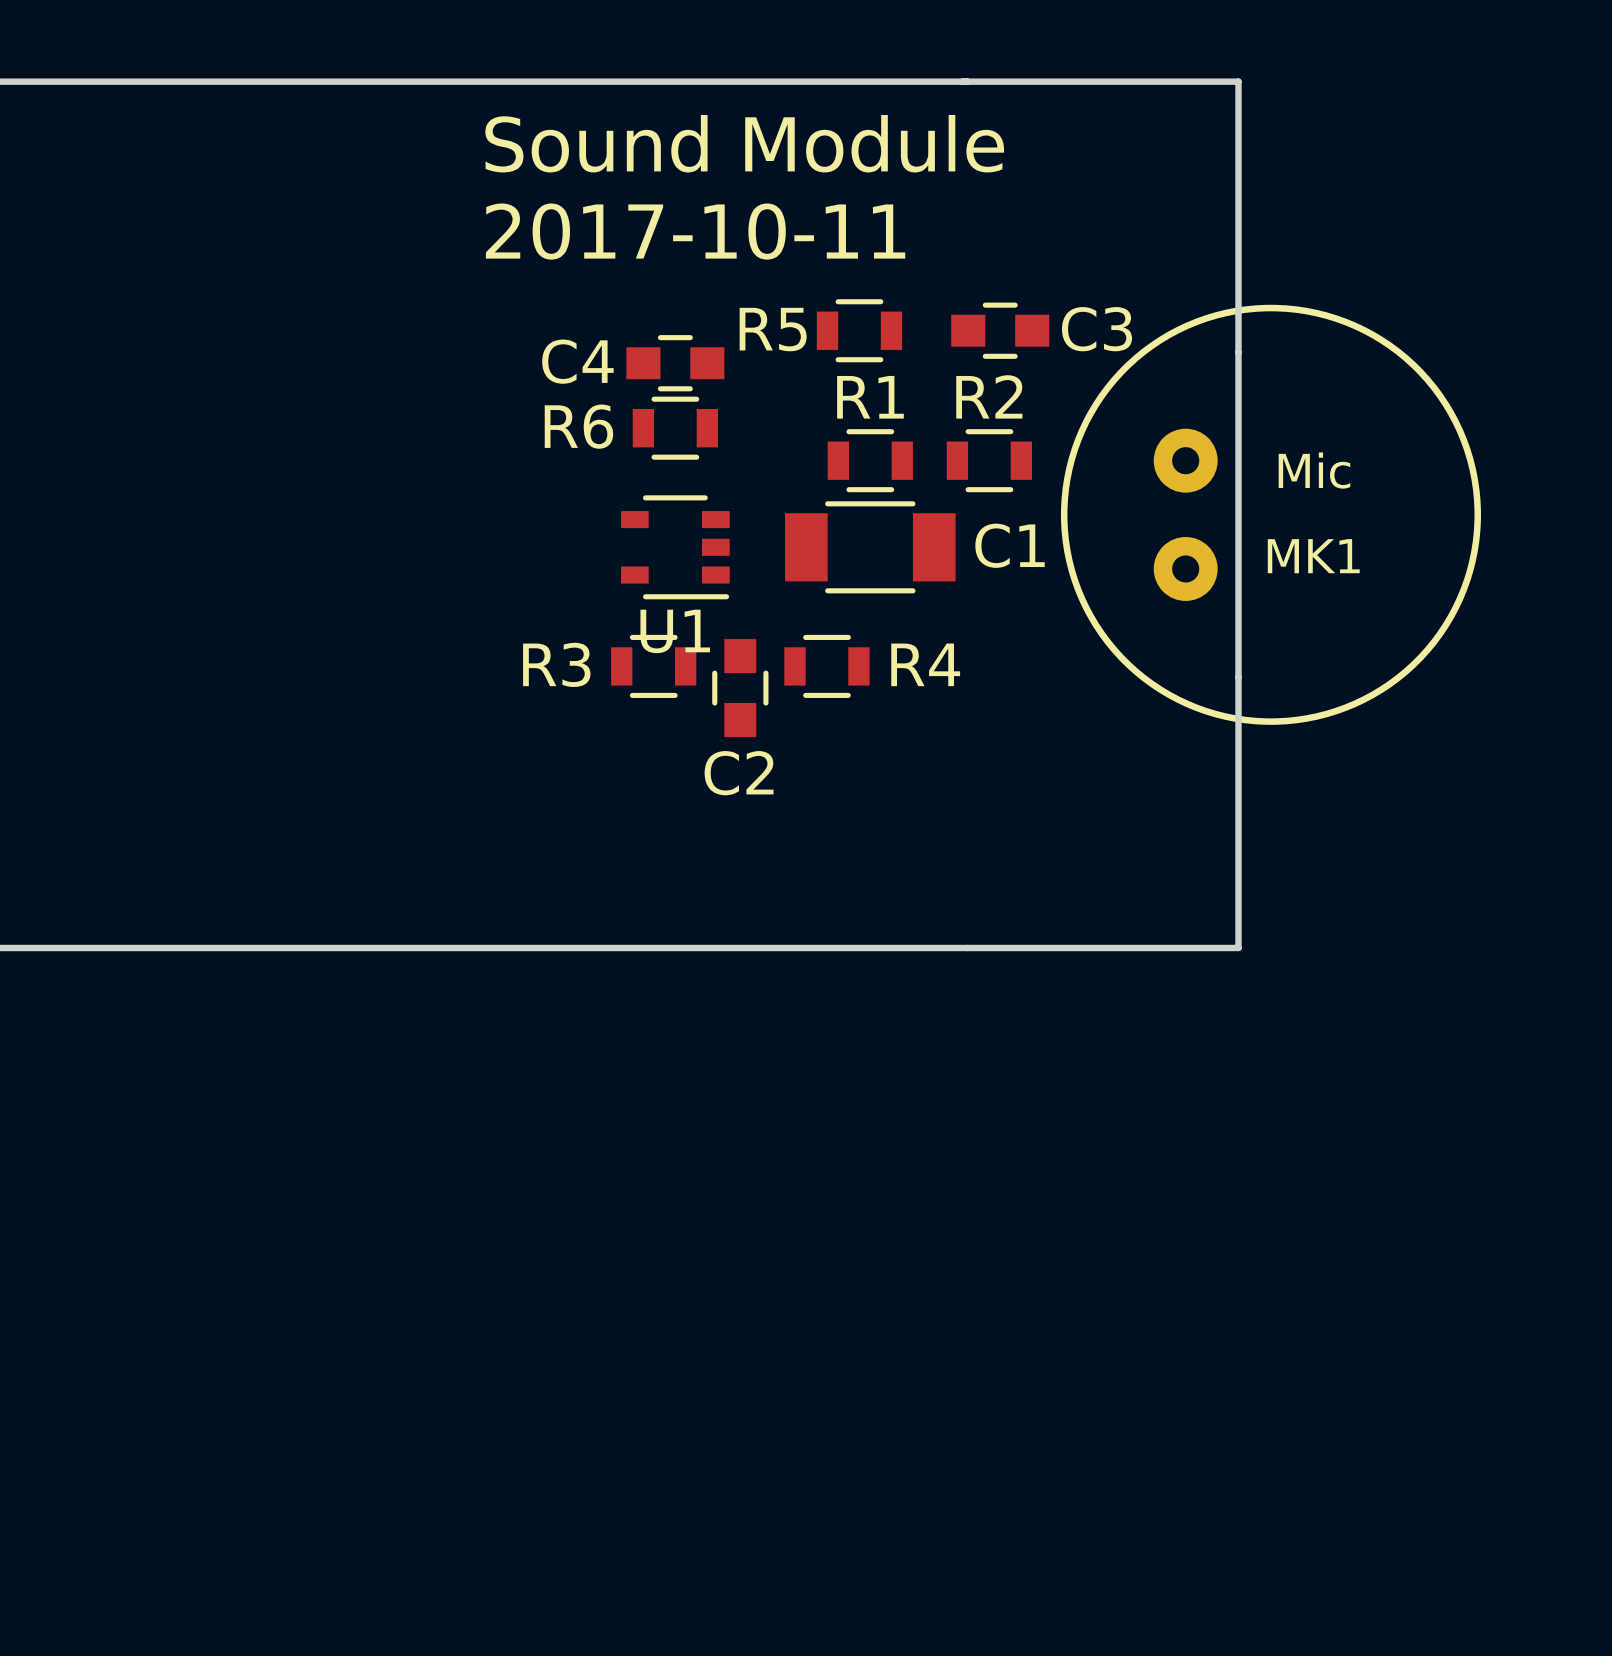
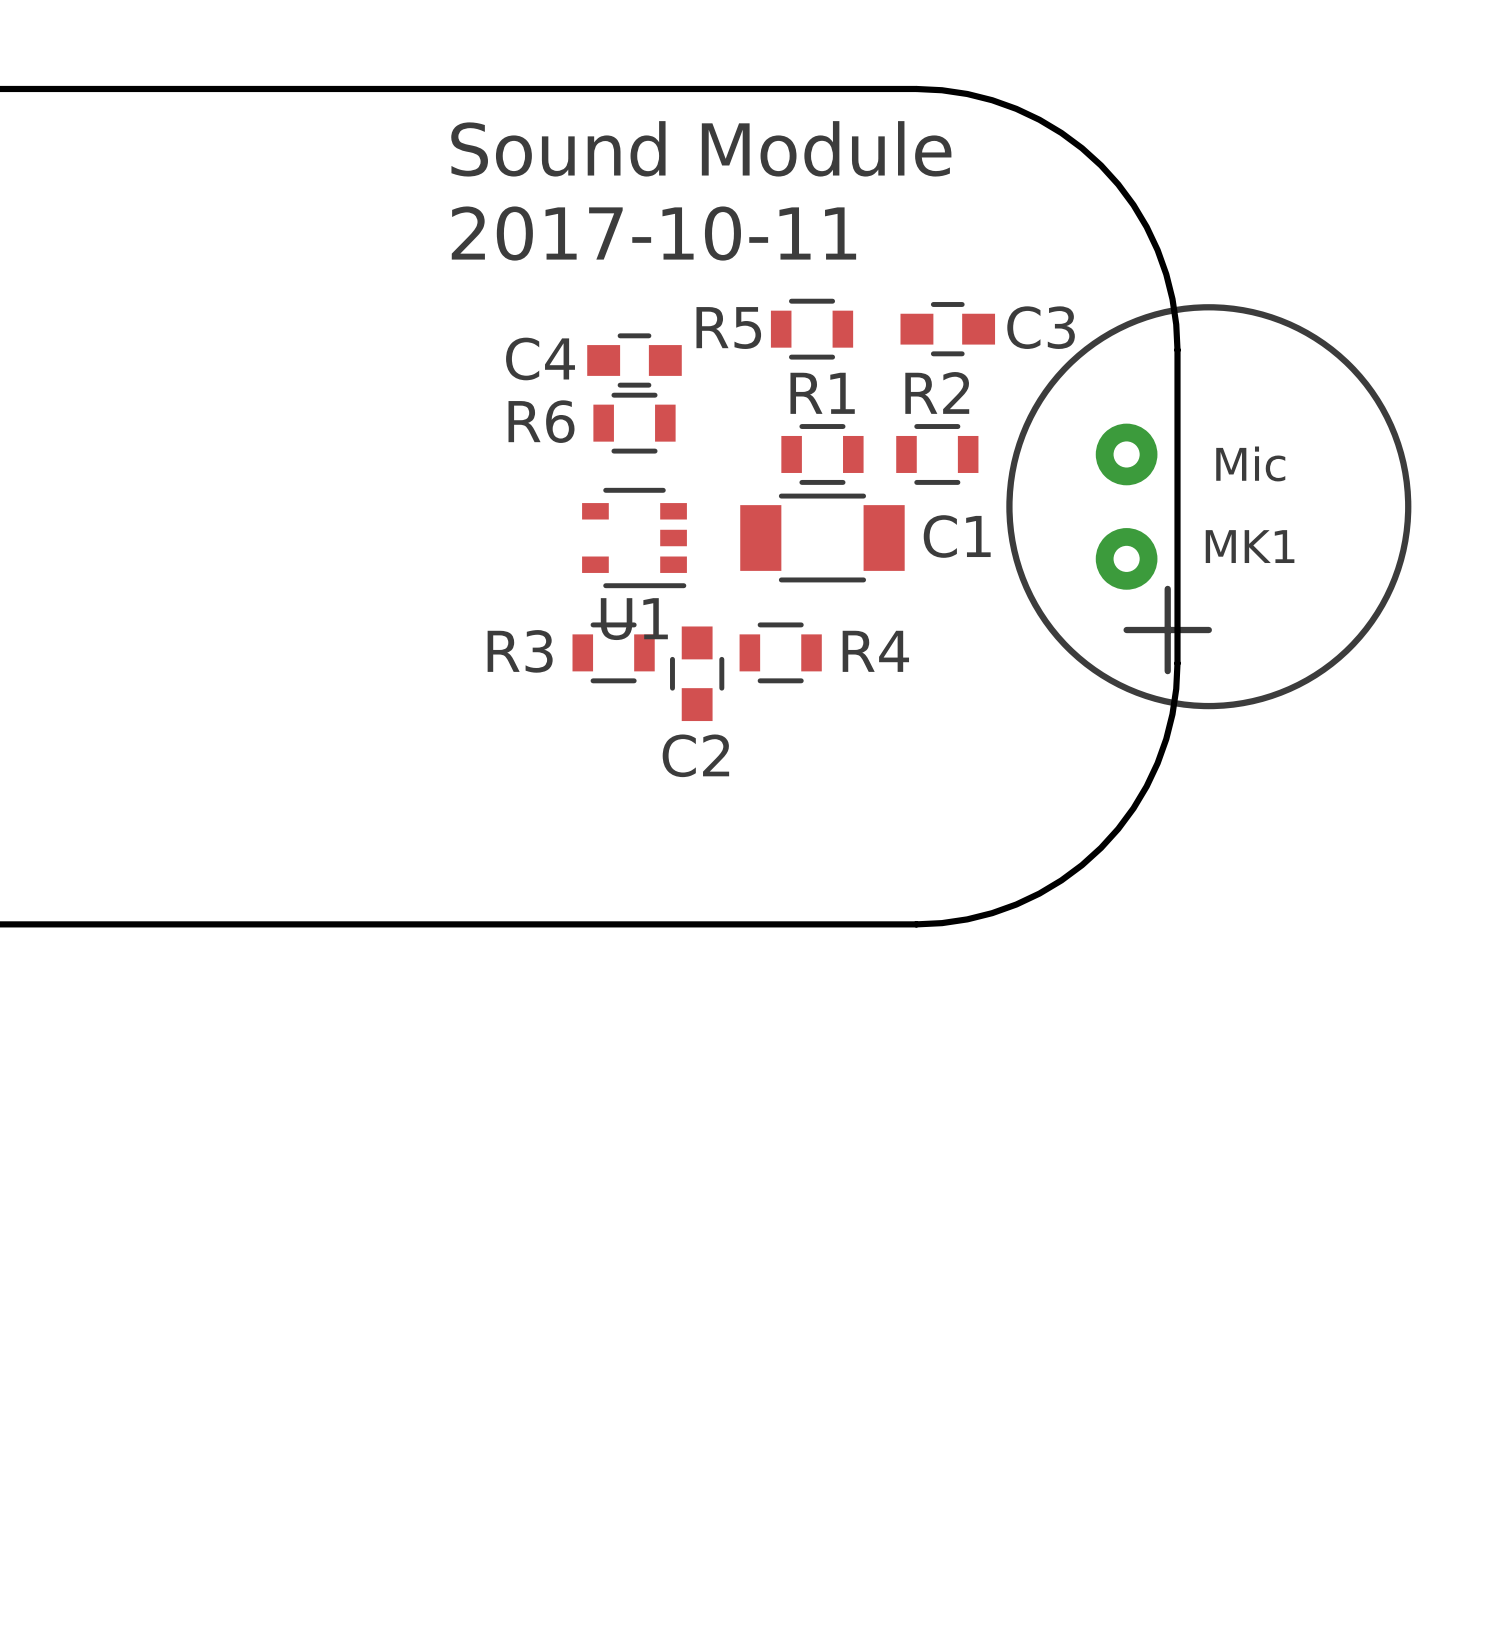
board edge: (967, 81) (1238, 81) (1238, 352) -> (916, 88) (967, 94) (1016, 108) (1061, 132) (1101, 165) (1133, 205) (1157, 250) (1172, 299) (1177, 350)
MK1 footprint: [1060, 304, 1481, 725] -> [1006, 304, 1412, 710]
board edge: (1238, 677) (1238, 947) (967, 947) -> (1177, 663) (1172, 714) (1157, 763) (1133, 808) (1101, 847) (1061, 880) (1016, 904) (967, 919) (916, 924)

